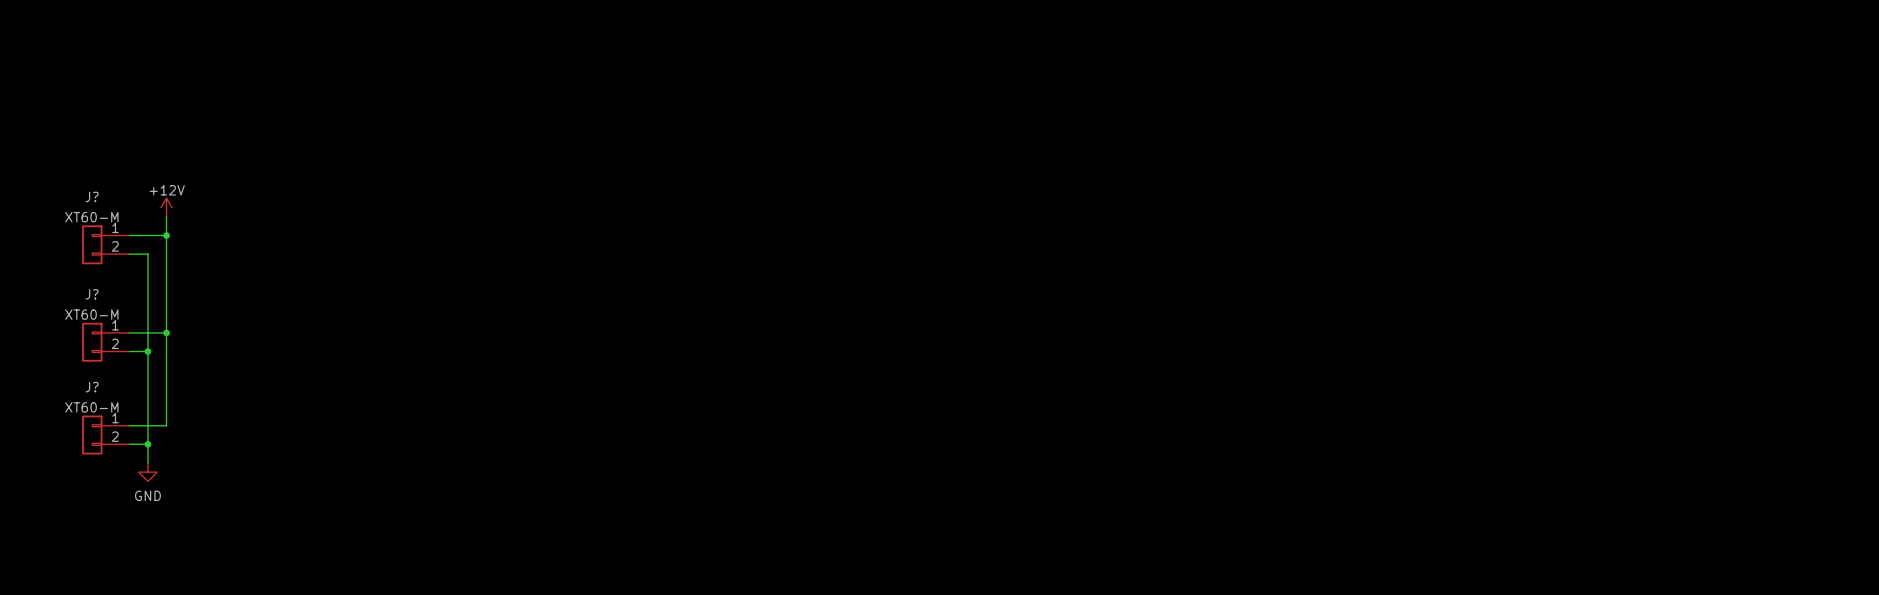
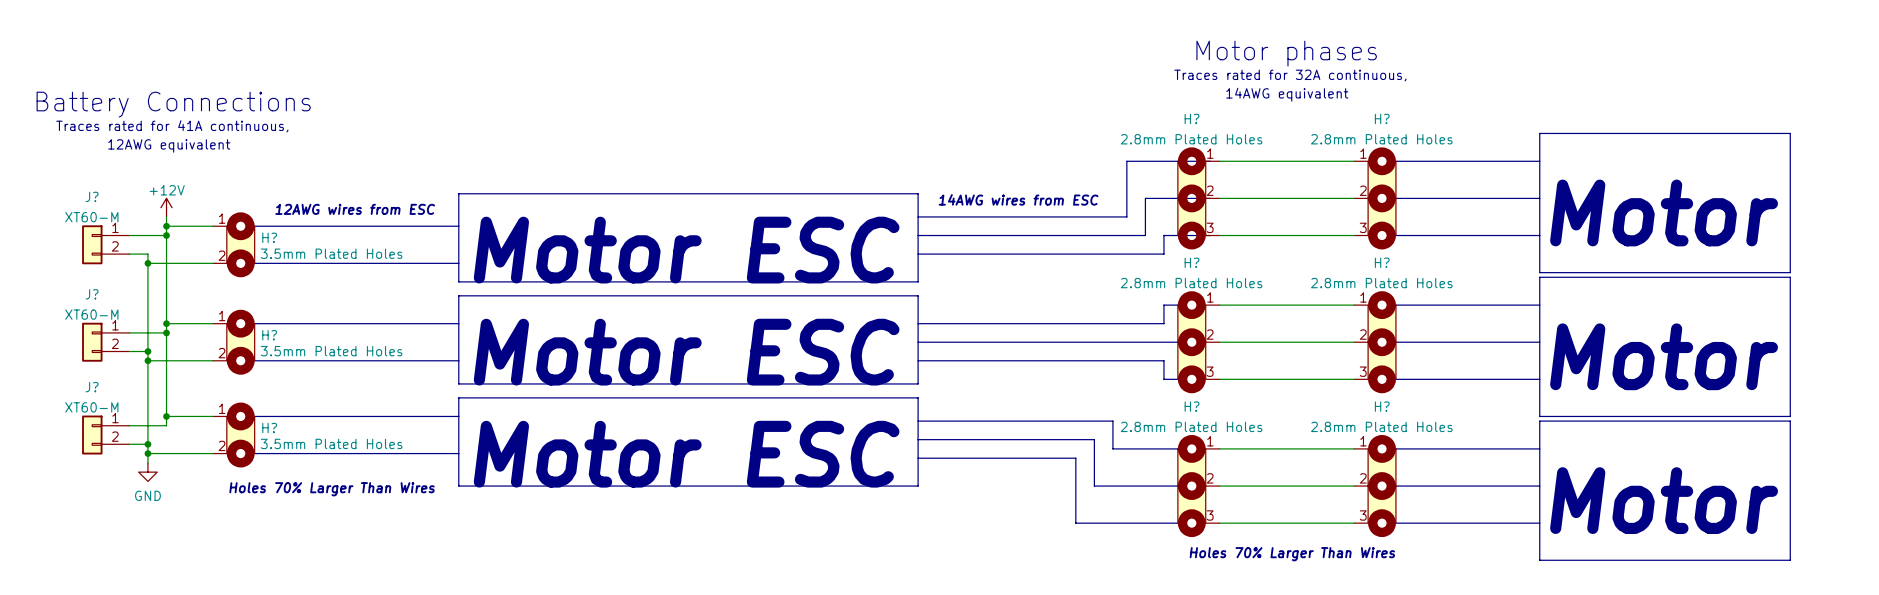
text: none -> Motor phases (1286, 53)
text: none -> Traces rated for 32A continuous, (1290, 75)
text: none -> 14AWG equivalent (1287, 94)
text: none -> Battery Connections (173, 104)
text: none -> Traces rated for 41A continuous, (172, 126)
line: none -> (1539, 133) (1539, 272) (1790, 272) (1790, 133) (1539, 133)
text: none -> 12AWG equivalent (169, 145)
line: none -> (1210, 161) (1126, 161) (1126, 216) (918, 216)
wire: none -> (1219, 161) (1354, 161)
line: none -> (1395, 161) (1539, 161)
line: none -> (458, 193) (458, 281) (918, 281) (918, 193) (458, 193)
H?: none -> 2.8mm Plated Holes (1198, 198)
line: none -> (1210, 198) (1145, 198) (1145, 235) (918, 235)
wire: none -> (1219, 198) (1354, 198)
H?: none -> 2.8mm Plated Holes (1375, 198)
line: none -> (1395, 198) (1539, 198)
text: none -> 14AWG wires from ESC (1018, 199)
text: none -> 12AWG wires from ESC (355, 209)
text: none -> Motor (1664, 212)
wire: none -> (166, 226) (212, 226)
junction: none -> (166, 226)
line: none -> (254, 226) (458, 226)
line: none -> (1210, 235) (1163, 235) (1163, 254) (918, 254)
wire: none -> (1219, 235) (1354, 235)
line: none -> (1395, 235) (1539, 235)
H?: none -> 3.5mm Plated Holes (234, 244)
text: none -> Motor ESC (686, 250)
wire: none -> (147, 263) (212, 263)
junction: none -> (147, 263)
line: none -> (254, 263) (458, 263)
line: none -> (1539, 277) (1539, 416) (1790, 416) (1790, 277) (1539, 277)
line: none -> (458, 295) (458, 383) (918, 383) (918, 295) (458, 295)
line: none -> (1177, 305) (1163, 305) (1163, 323) (918, 323)
wire: none -> (1219, 305) (1354, 305)
line: none -> (1395, 305) (1539, 305)
wire: none -> (166, 323) (212, 323)
junction: none -> (166, 323)
line: none -> (254, 323) (458, 323)
H?: none -> 3.5mm Plated Holes (234, 342)
line: none -> (918, 342) (1177, 342)
H?: none -> 2.8mm Plated Holes (1198, 342)
wire: none -> (1219, 342) (1354, 342)
H?: none -> 2.8mm Plated Holes (1375, 342)
line: none -> (1395, 342) (1539, 342)
text: none -> Motor ESC (686, 352)
text: none -> Motor (1664, 356)
wire: none -> (147, 360) (212, 360)
junction: none -> (147, 360)
line: none -> (254, 360) (458, 360)
line: none -> (918, 360) (1163, 360) (1163, 379) (1177, 379)
wire: none -> (1219, 379) (1354, 379)
line: none -> (1395, 379) (1539, 379)
line: none -> (458, 397) (458, 486) (918, 486) (918, 397) (458, 397)
wire: none -> (166, 416) (212, 416)
junction: none -> (166, 416)
line: none -> (254, 416) (458, 416)
line: none -> (918, 421) (1112, 421) (1112, 448) (1177, 448)
line: none -> (1539, 421) (1539, 560) (1790, 560) (1790, 421) (1539, 421)
H?: none -> 3.5mm Plated Holes (234, 435)
line: none -> (918, 439) (1094, 439) (1094, 486) (1177, 486)
wire: none -> (1219, 448) (1354, 448)
line: none -> (1395, 448) (1539, 448)
wire: none -> (147, 453) (212, 453)
junction: none -> (147, 453)
line: none -> (254, 453) (458, 453)
text: none -> Motor ESC (686, 454)
line: none -> (918, 458) (1075, 458) (1075, 523) (1177, 523)
H?: none -> 2.8mm Plated Holes (1198, 486)
wire: none -> (1219, 486) (1354, 486)
H?: none -> 2.8mm Plated Holes (1375, 486)
line: none -> (1395, 486) (1539, 486)
text: none -> Holes 70% Larger Than Wires (332, 489)
text: none -> Motor (1664, 500)
wire: none -> (1219, 523) (1354, 523)
line: none -> (1395, 523) (1539, 523)
text: none -> Holes 70% Larger Than Wires (1292, 554)

